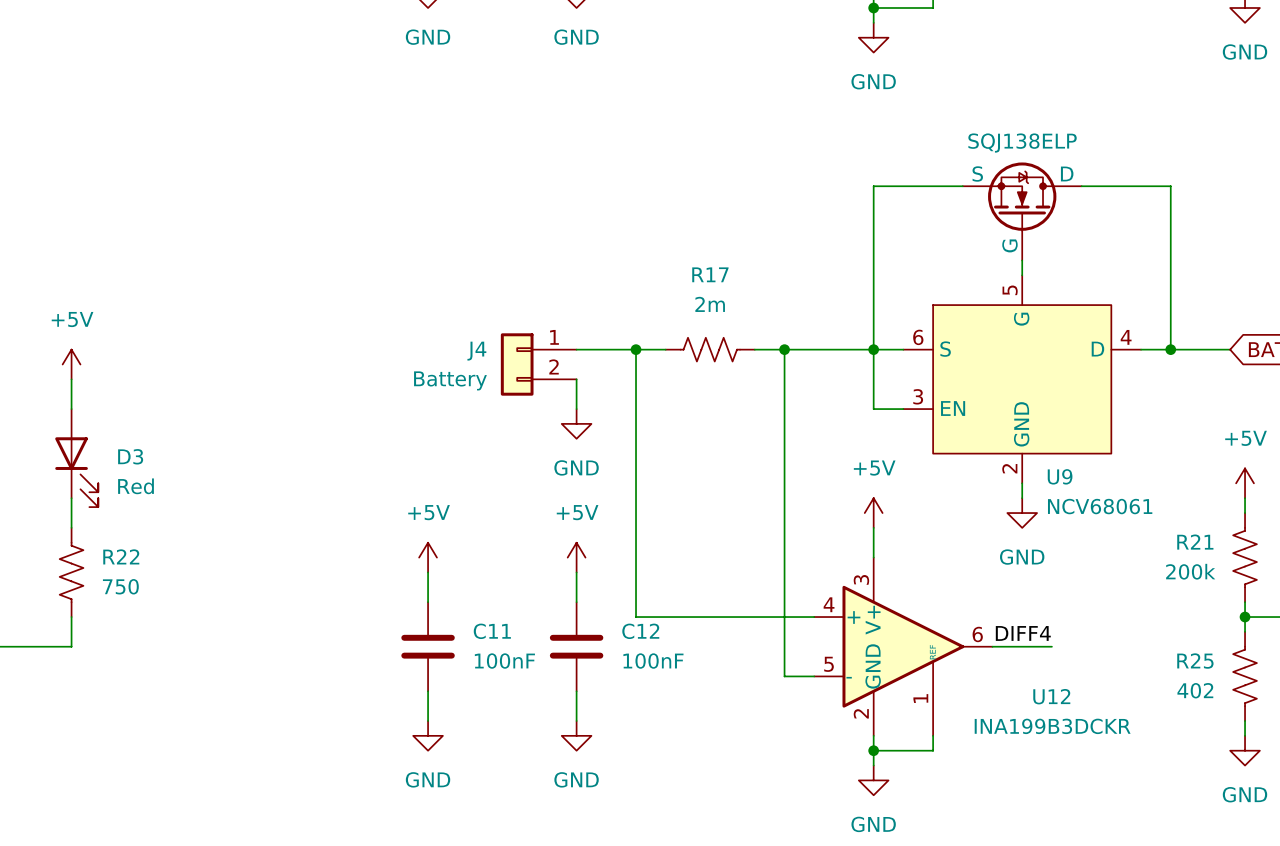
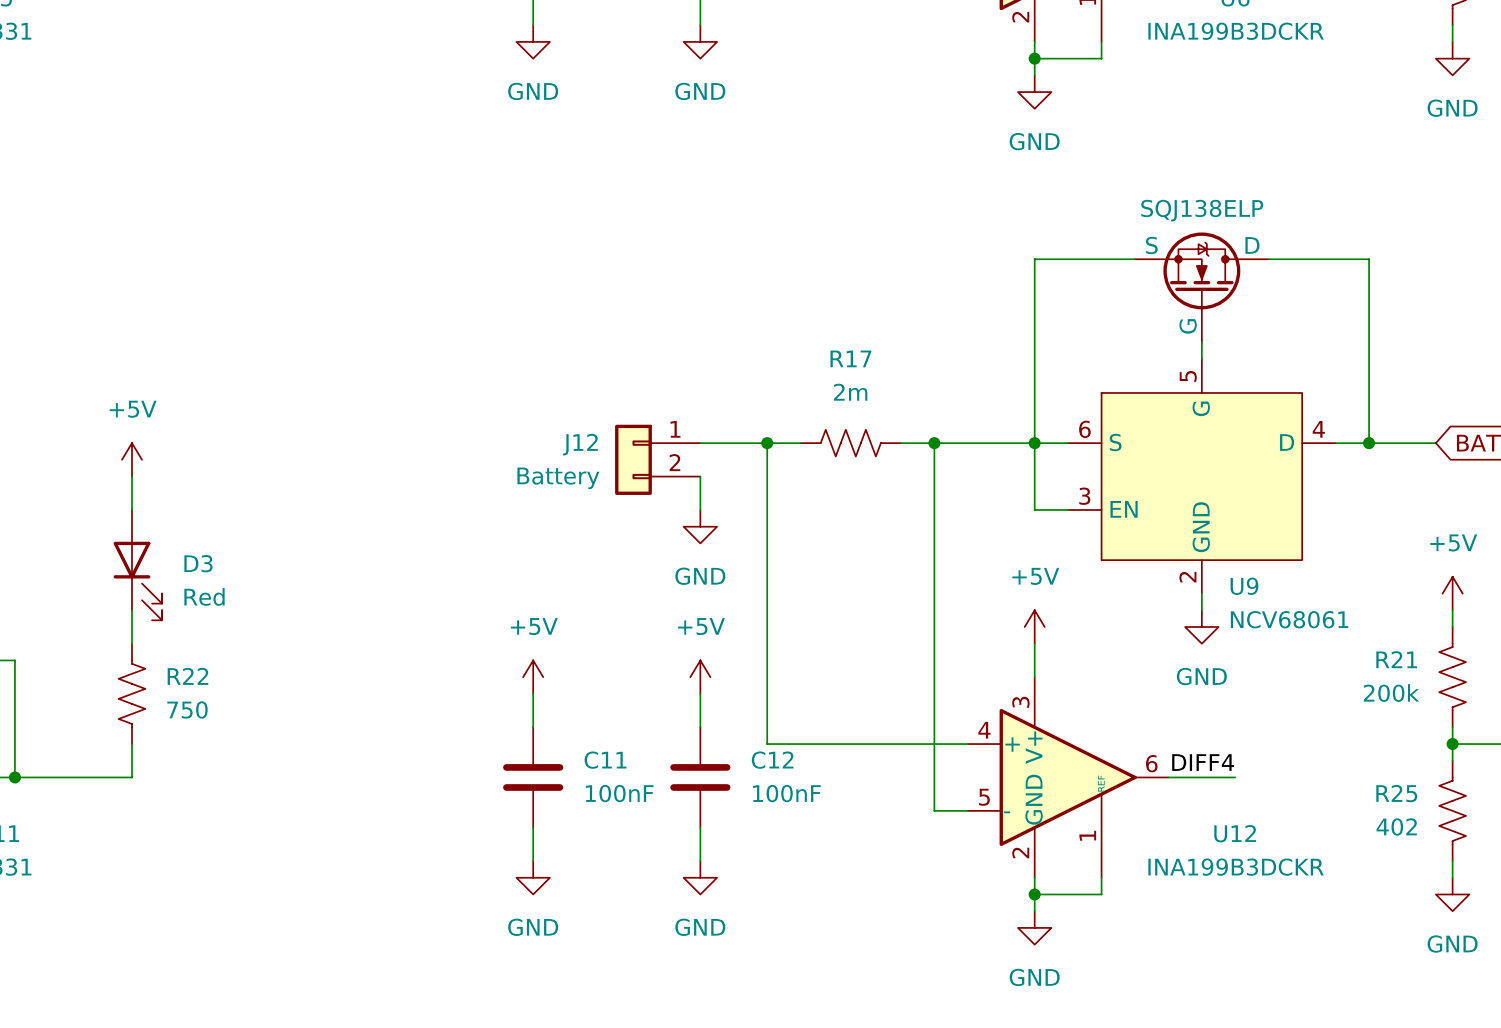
J4 name: J4 (476, 351) -> J12 (580, 444)

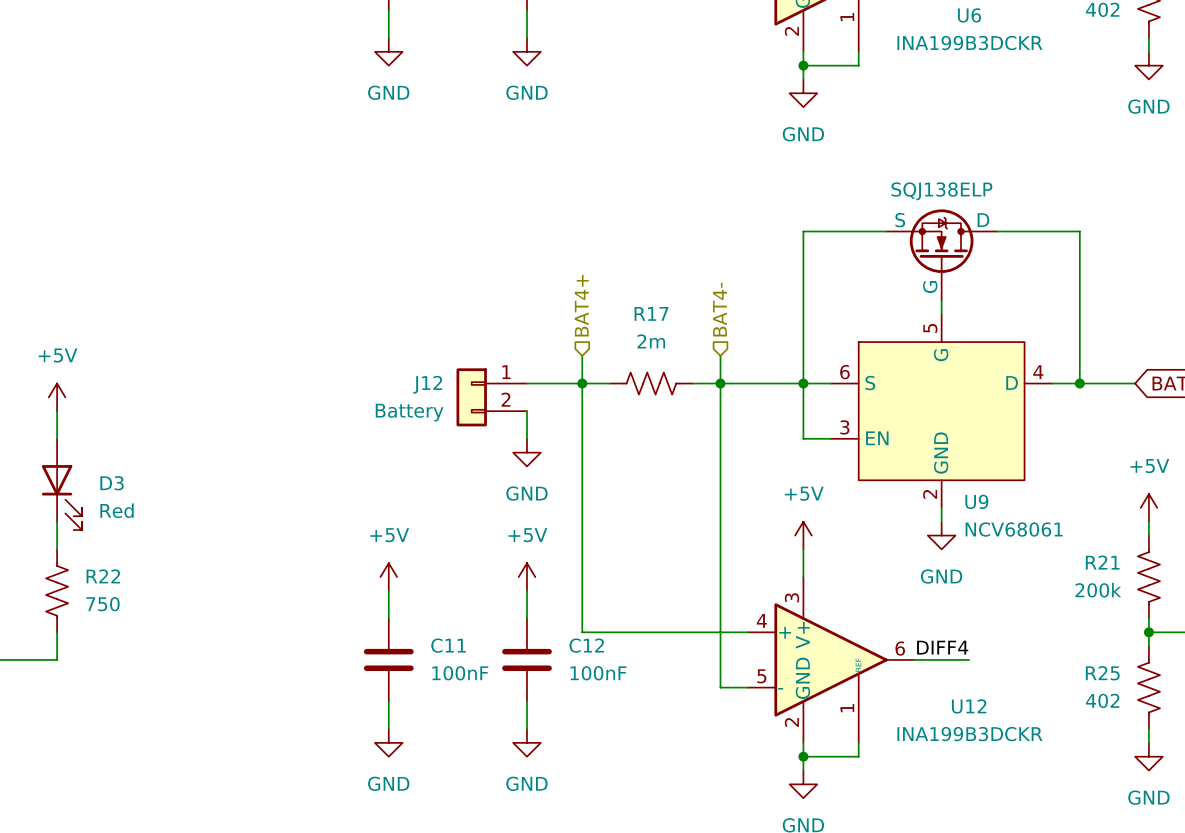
hierarchical label: none -> BAT4+ (581, 305)
hierarchical label: none -> BAT4- (719, 309)
wire: none -> (582, 355) (582, 383)
wire: none -> (720, 355) (720, 383)

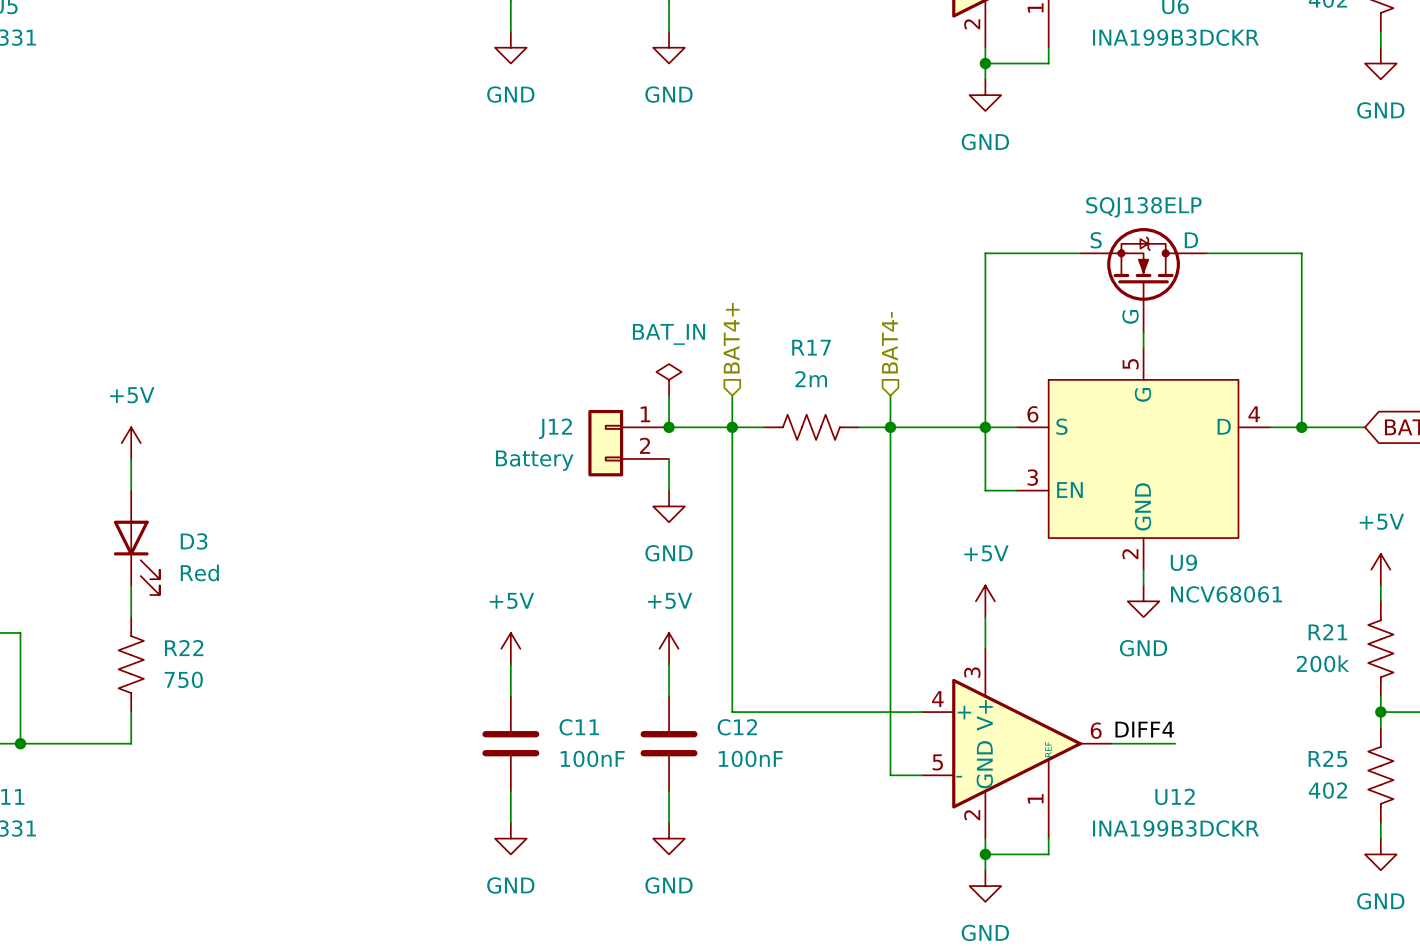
power symbol: none -> BAT_IN (669, 379)
wire: none -> (669, 395) (669, 427)
junction: none -> (669, 427)

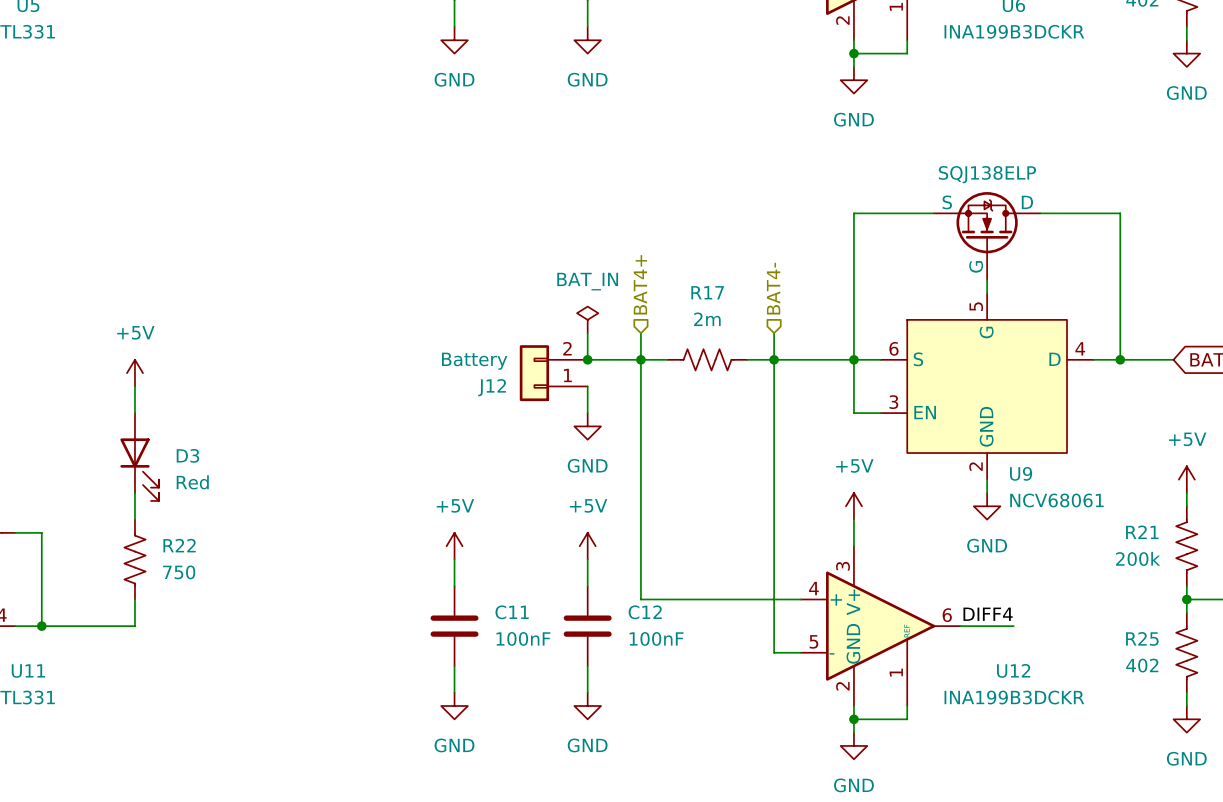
J12 flip: as is (605, 443) -> up-down (534, 373)

